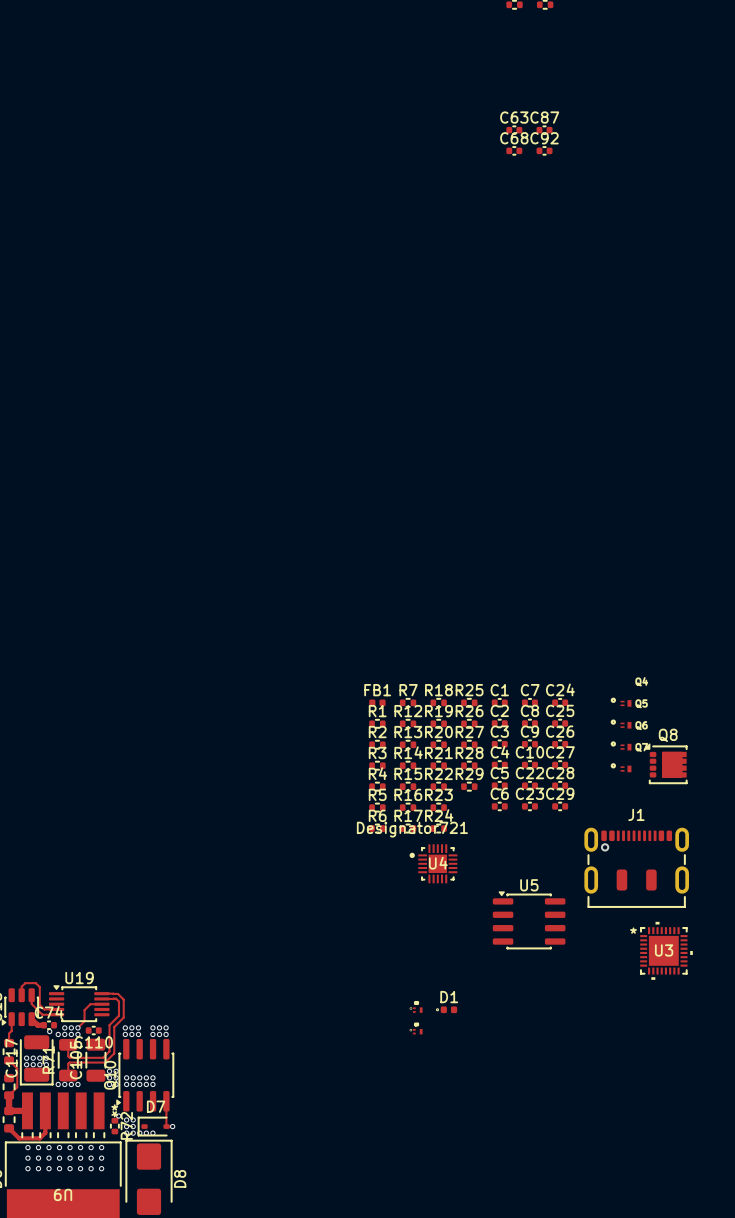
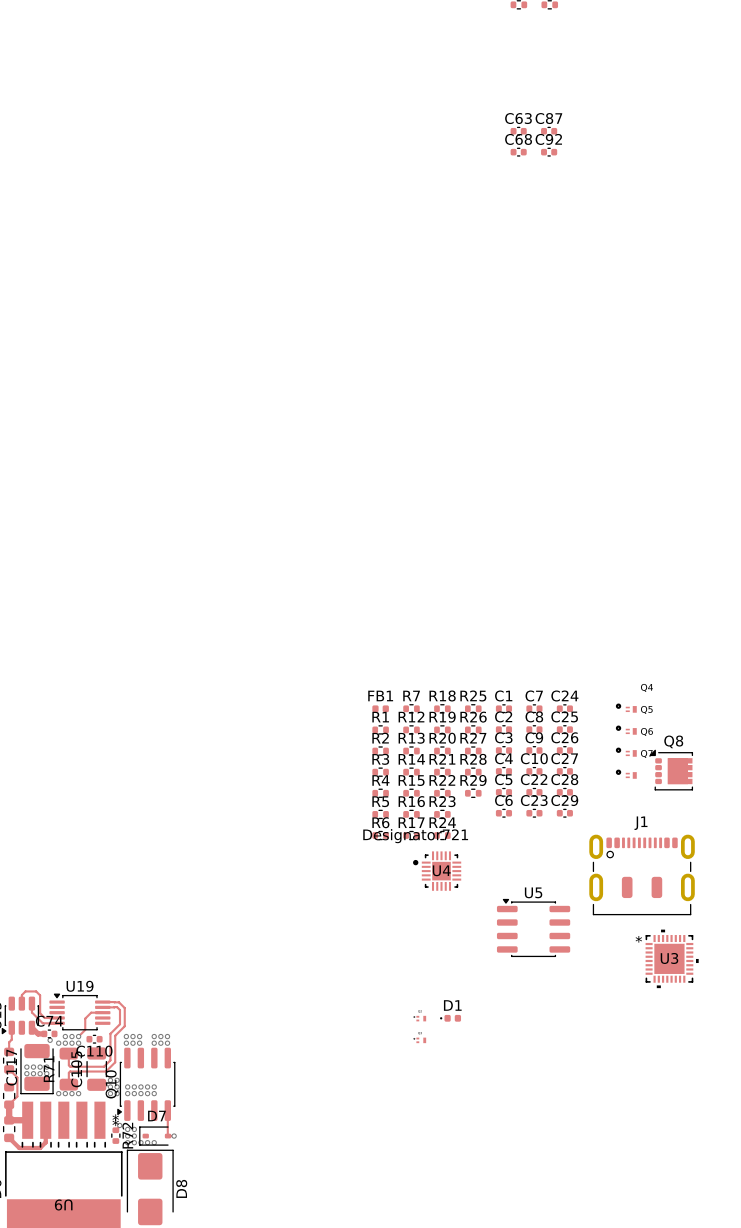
via: (27, 1147) -> none
via: (38, 1147) -> none
via: (49, 1147) -> none
via: (59, 1147) -> none
via: (70, 1147) -> none
via: (80, 1147) -> none
via: (91, 1147) -> none
via: (101, 1147) -> none
via: (27, 1158) -> none
via: (38, 1158) -> none
via: (49, 1158) -> none
via: (59, 1158) -> none
via: (70, 1158) -> none
via: (80, 1158) -> none
via: (91, 1158) -> none
via: (101, 1158) -> none
via: (27, 1168) -> none
via: (38, 1168) -> none
via: (49, 1168) -> none
via: (59, 1168) -> none
via: (70, 1168) -> none
via: (80, 1168) -> none
via: (91, 1168) -> none
via: (101, 1168) -> none

